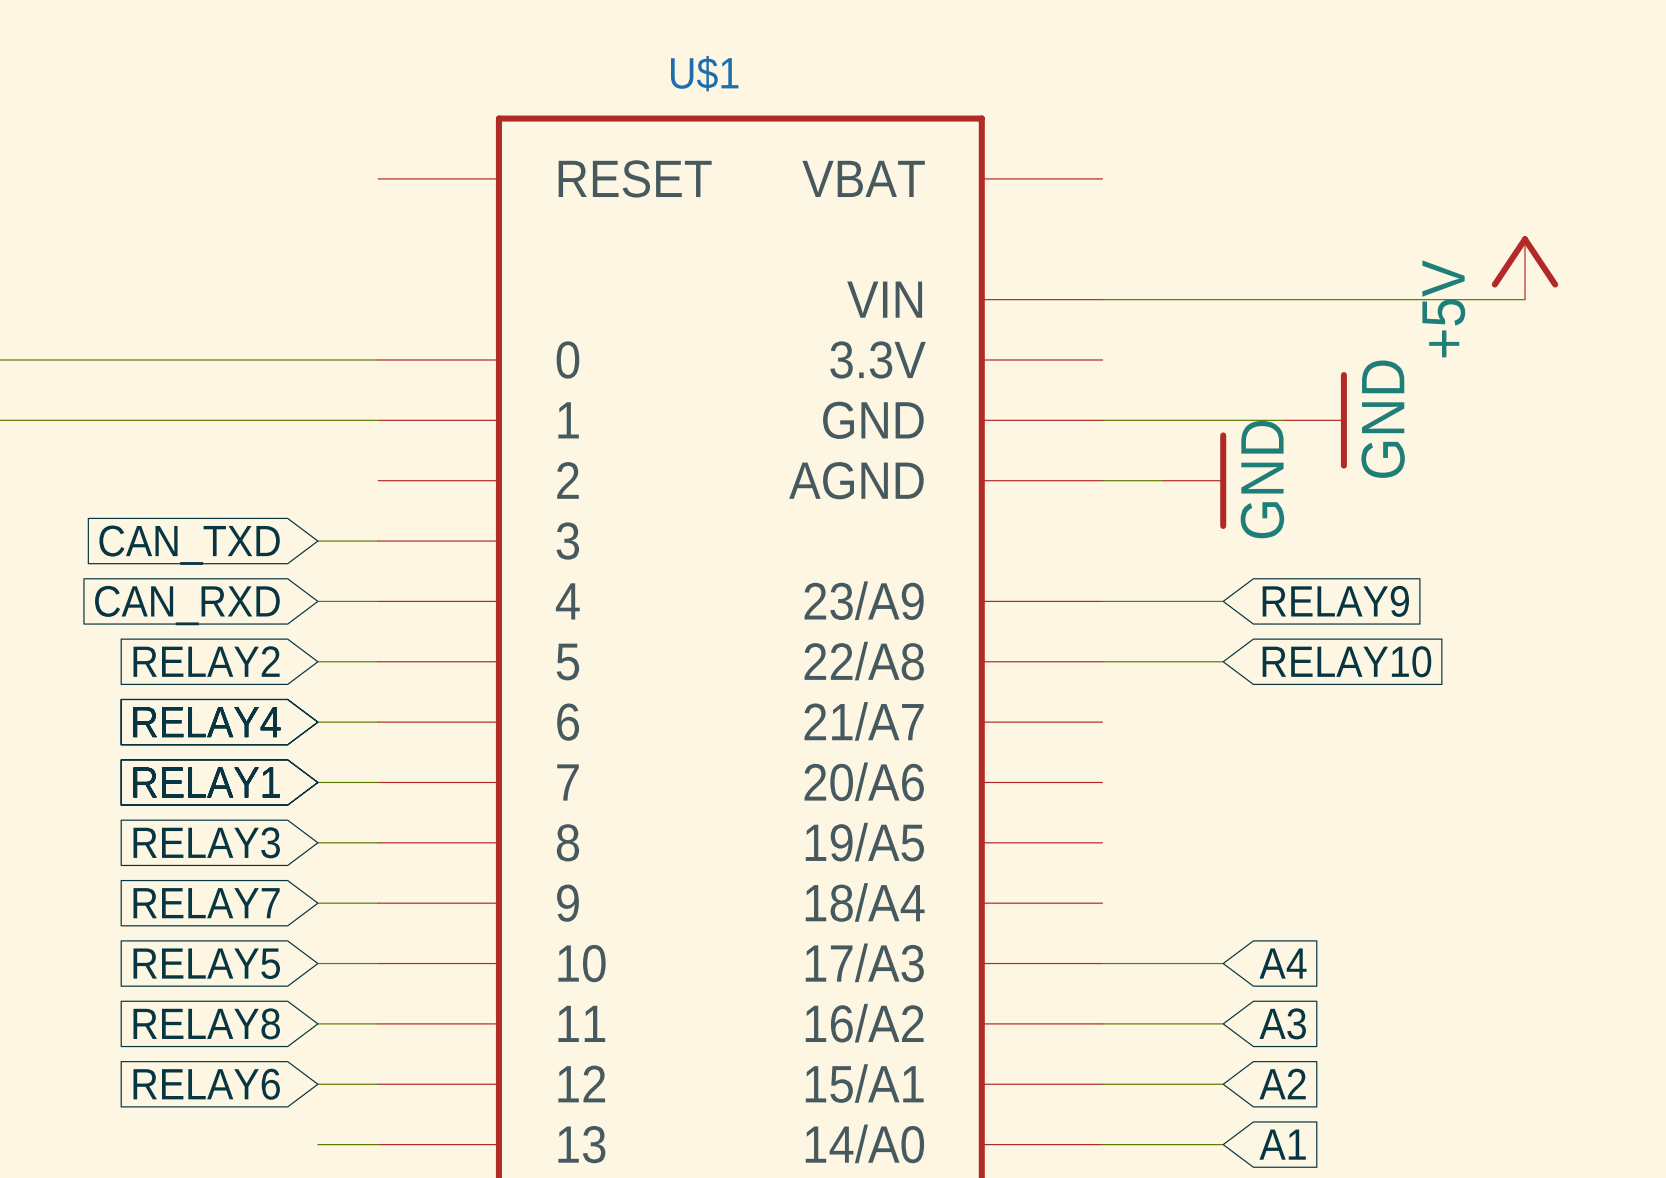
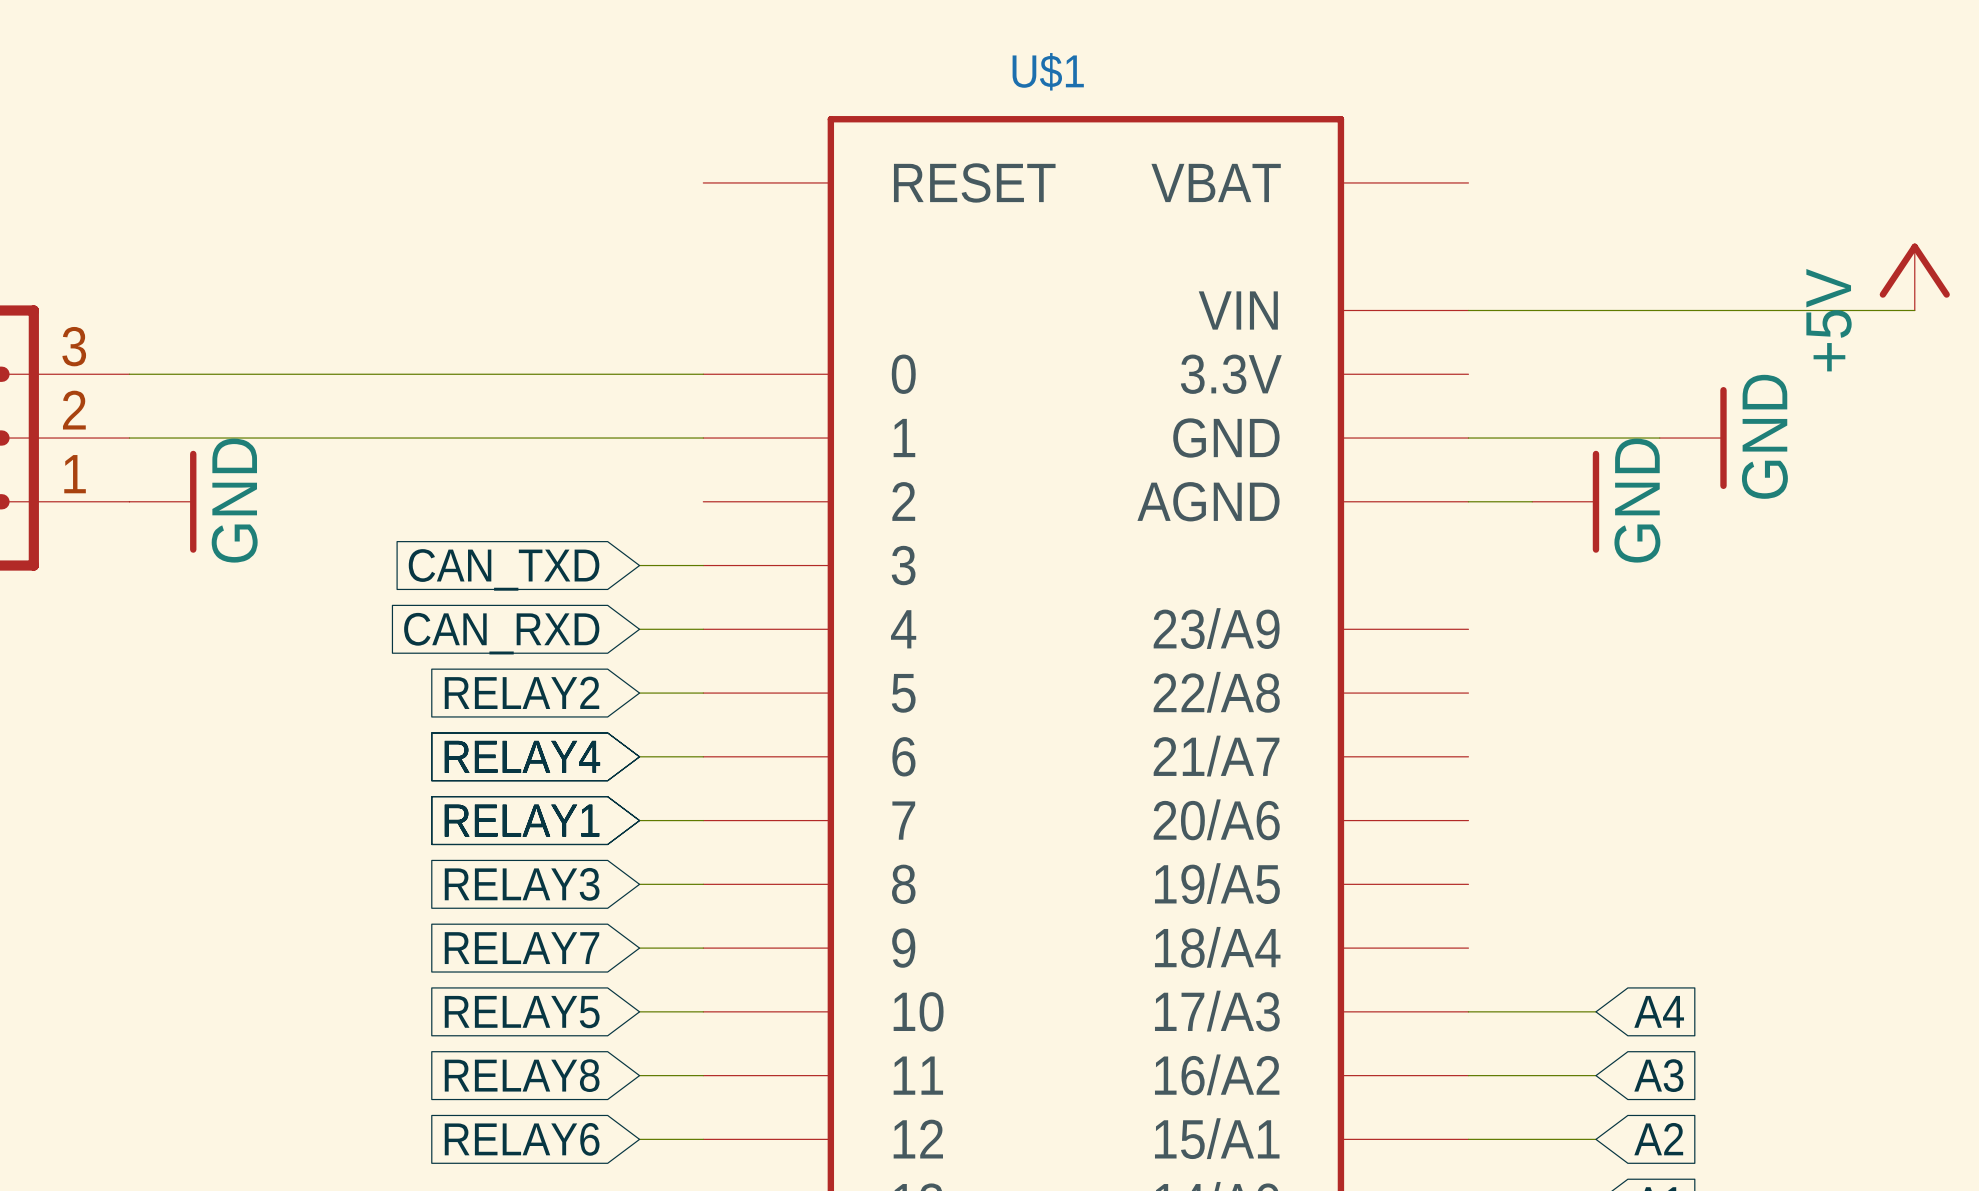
wire: (1102, 601) (1223, 601) -> none
global label: RELAY9 (1335, 601) -> none
wire: (1102, 661) (1223, 661) -> none
global label: RELAY10 (1346, 661) -> none

